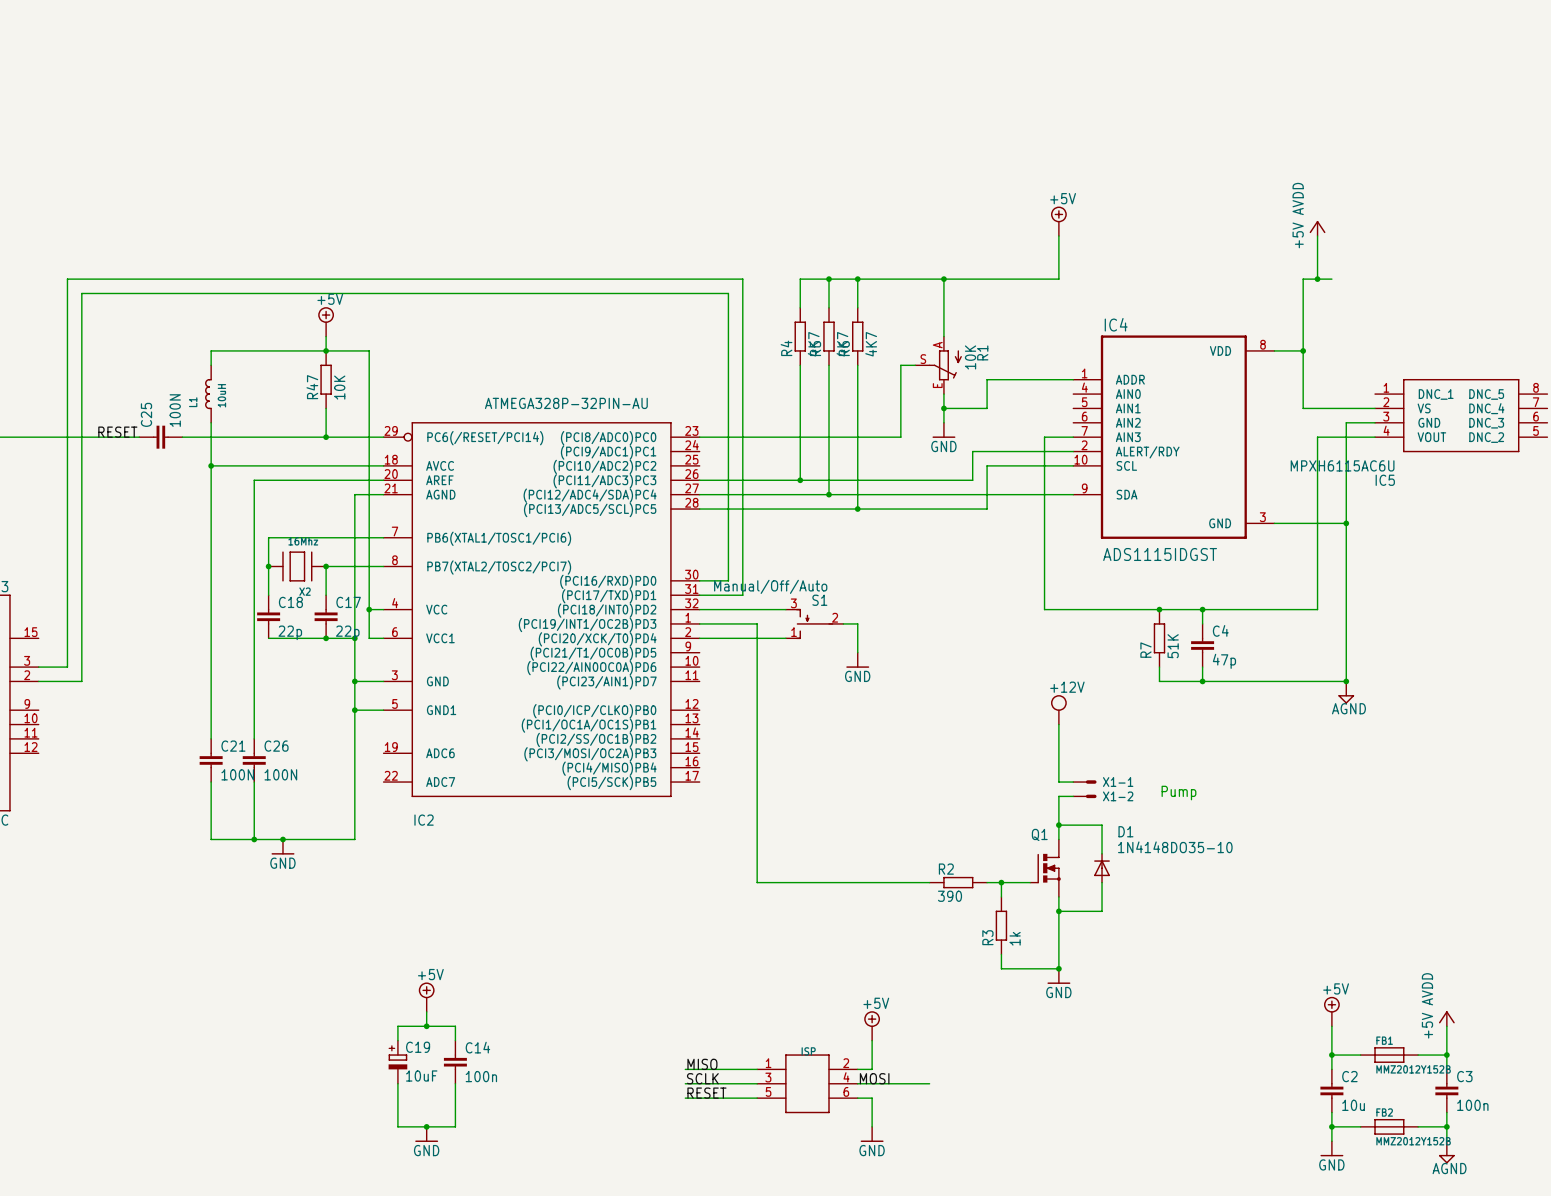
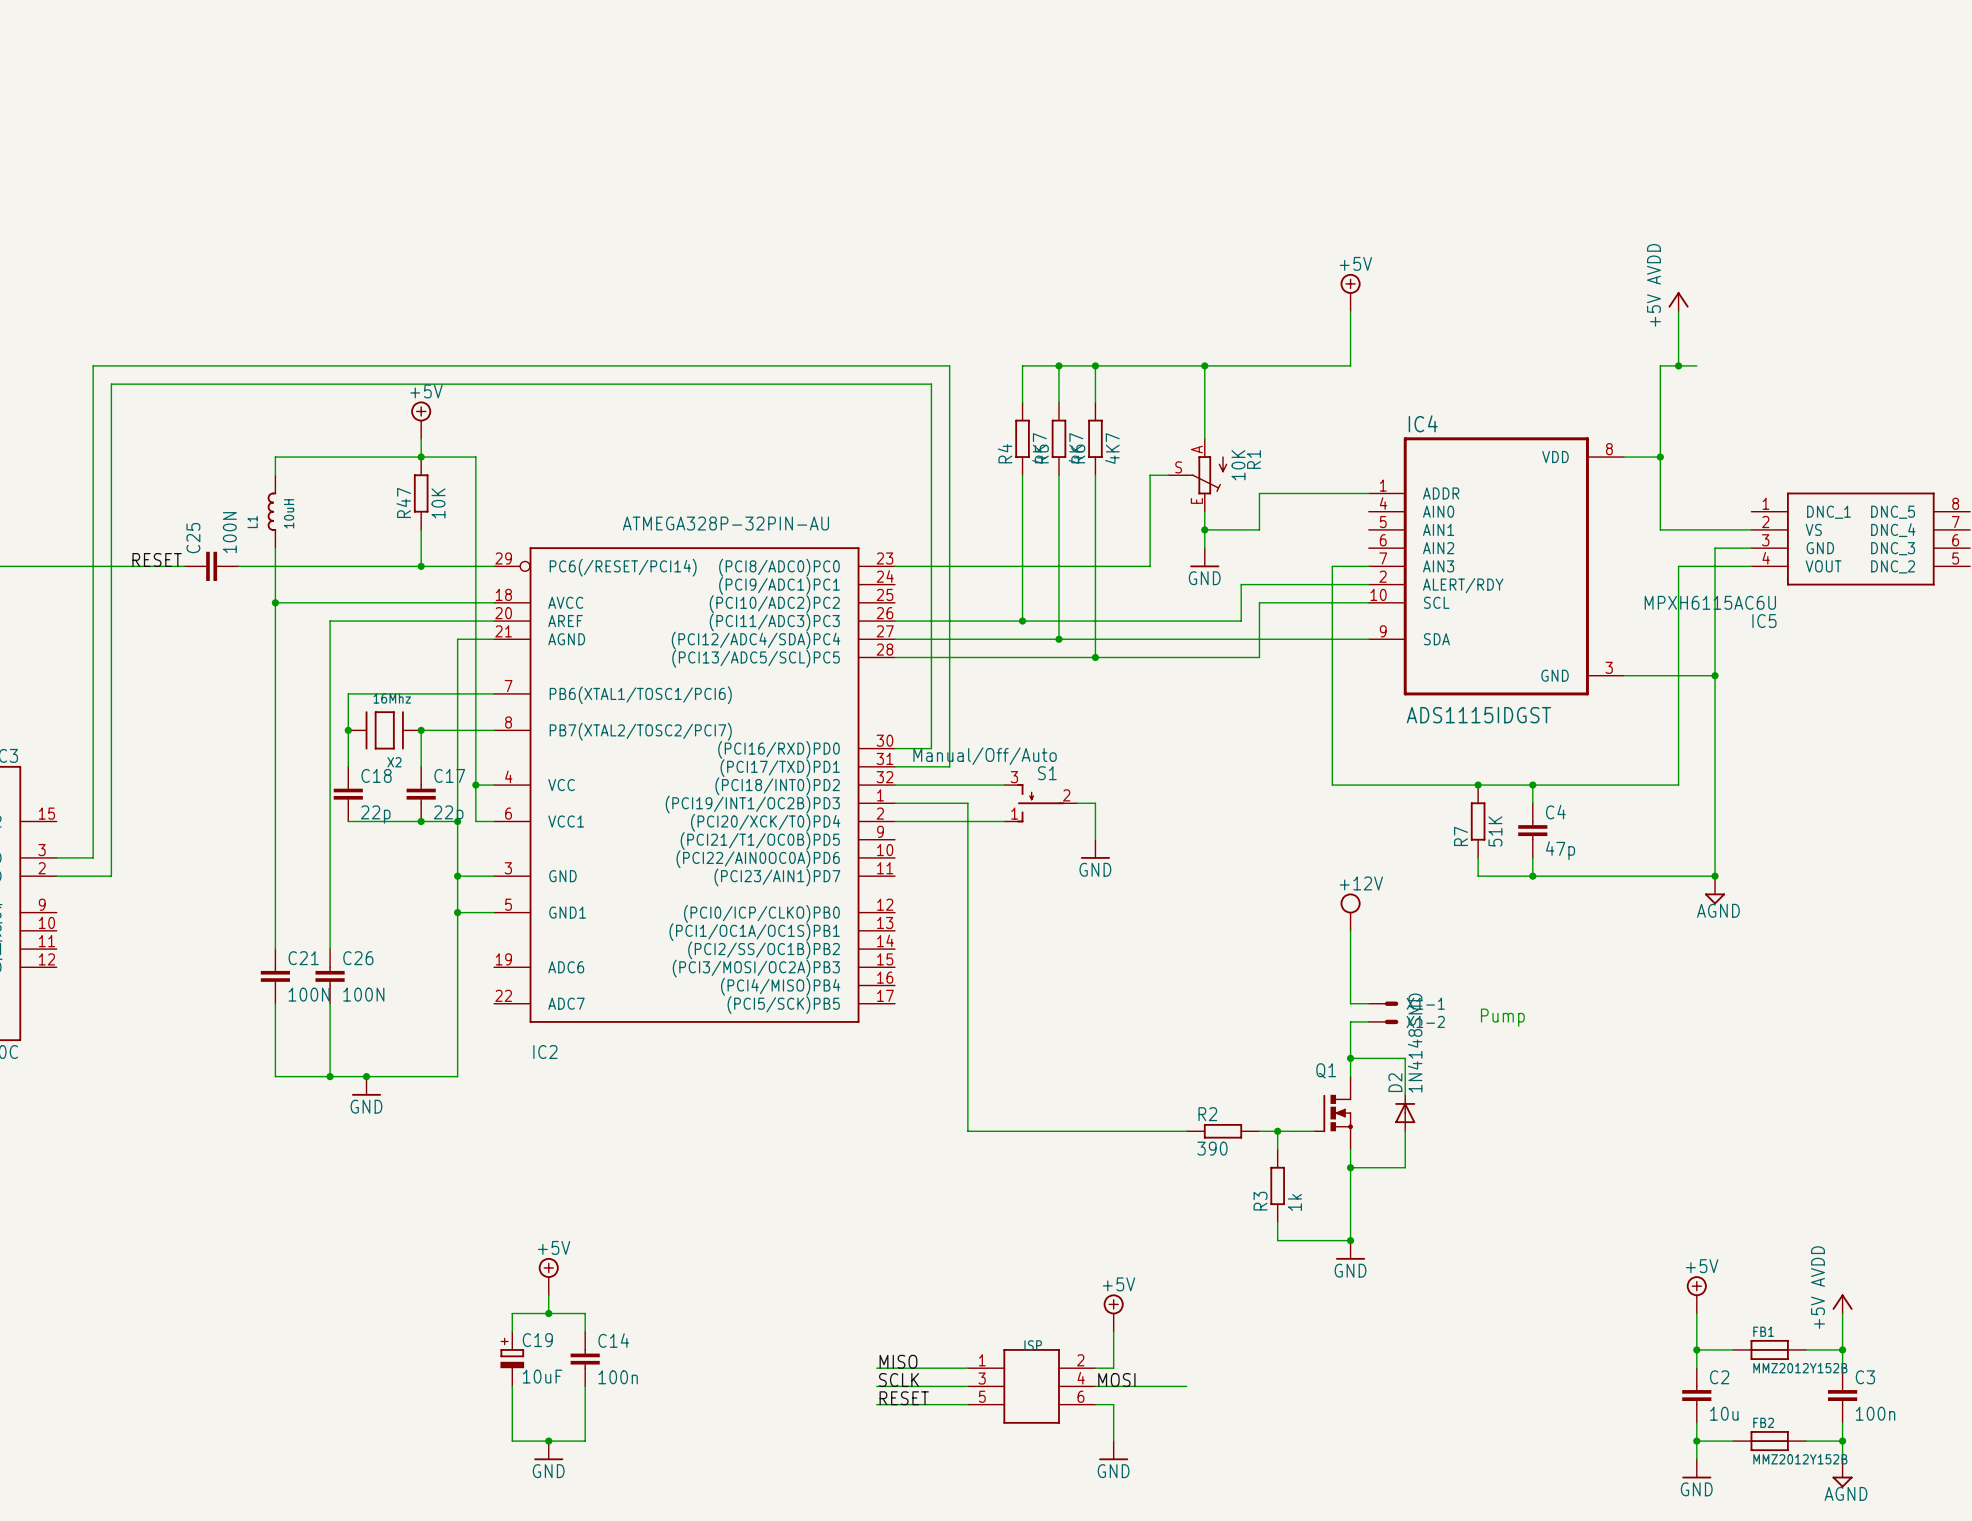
D1 name: D1 (1125, 831) -> D2 (1395, 1082)
D1 value: 1N4148DO35-10 (1175, 847) -> 1N4148SMD (1415, 1043)

